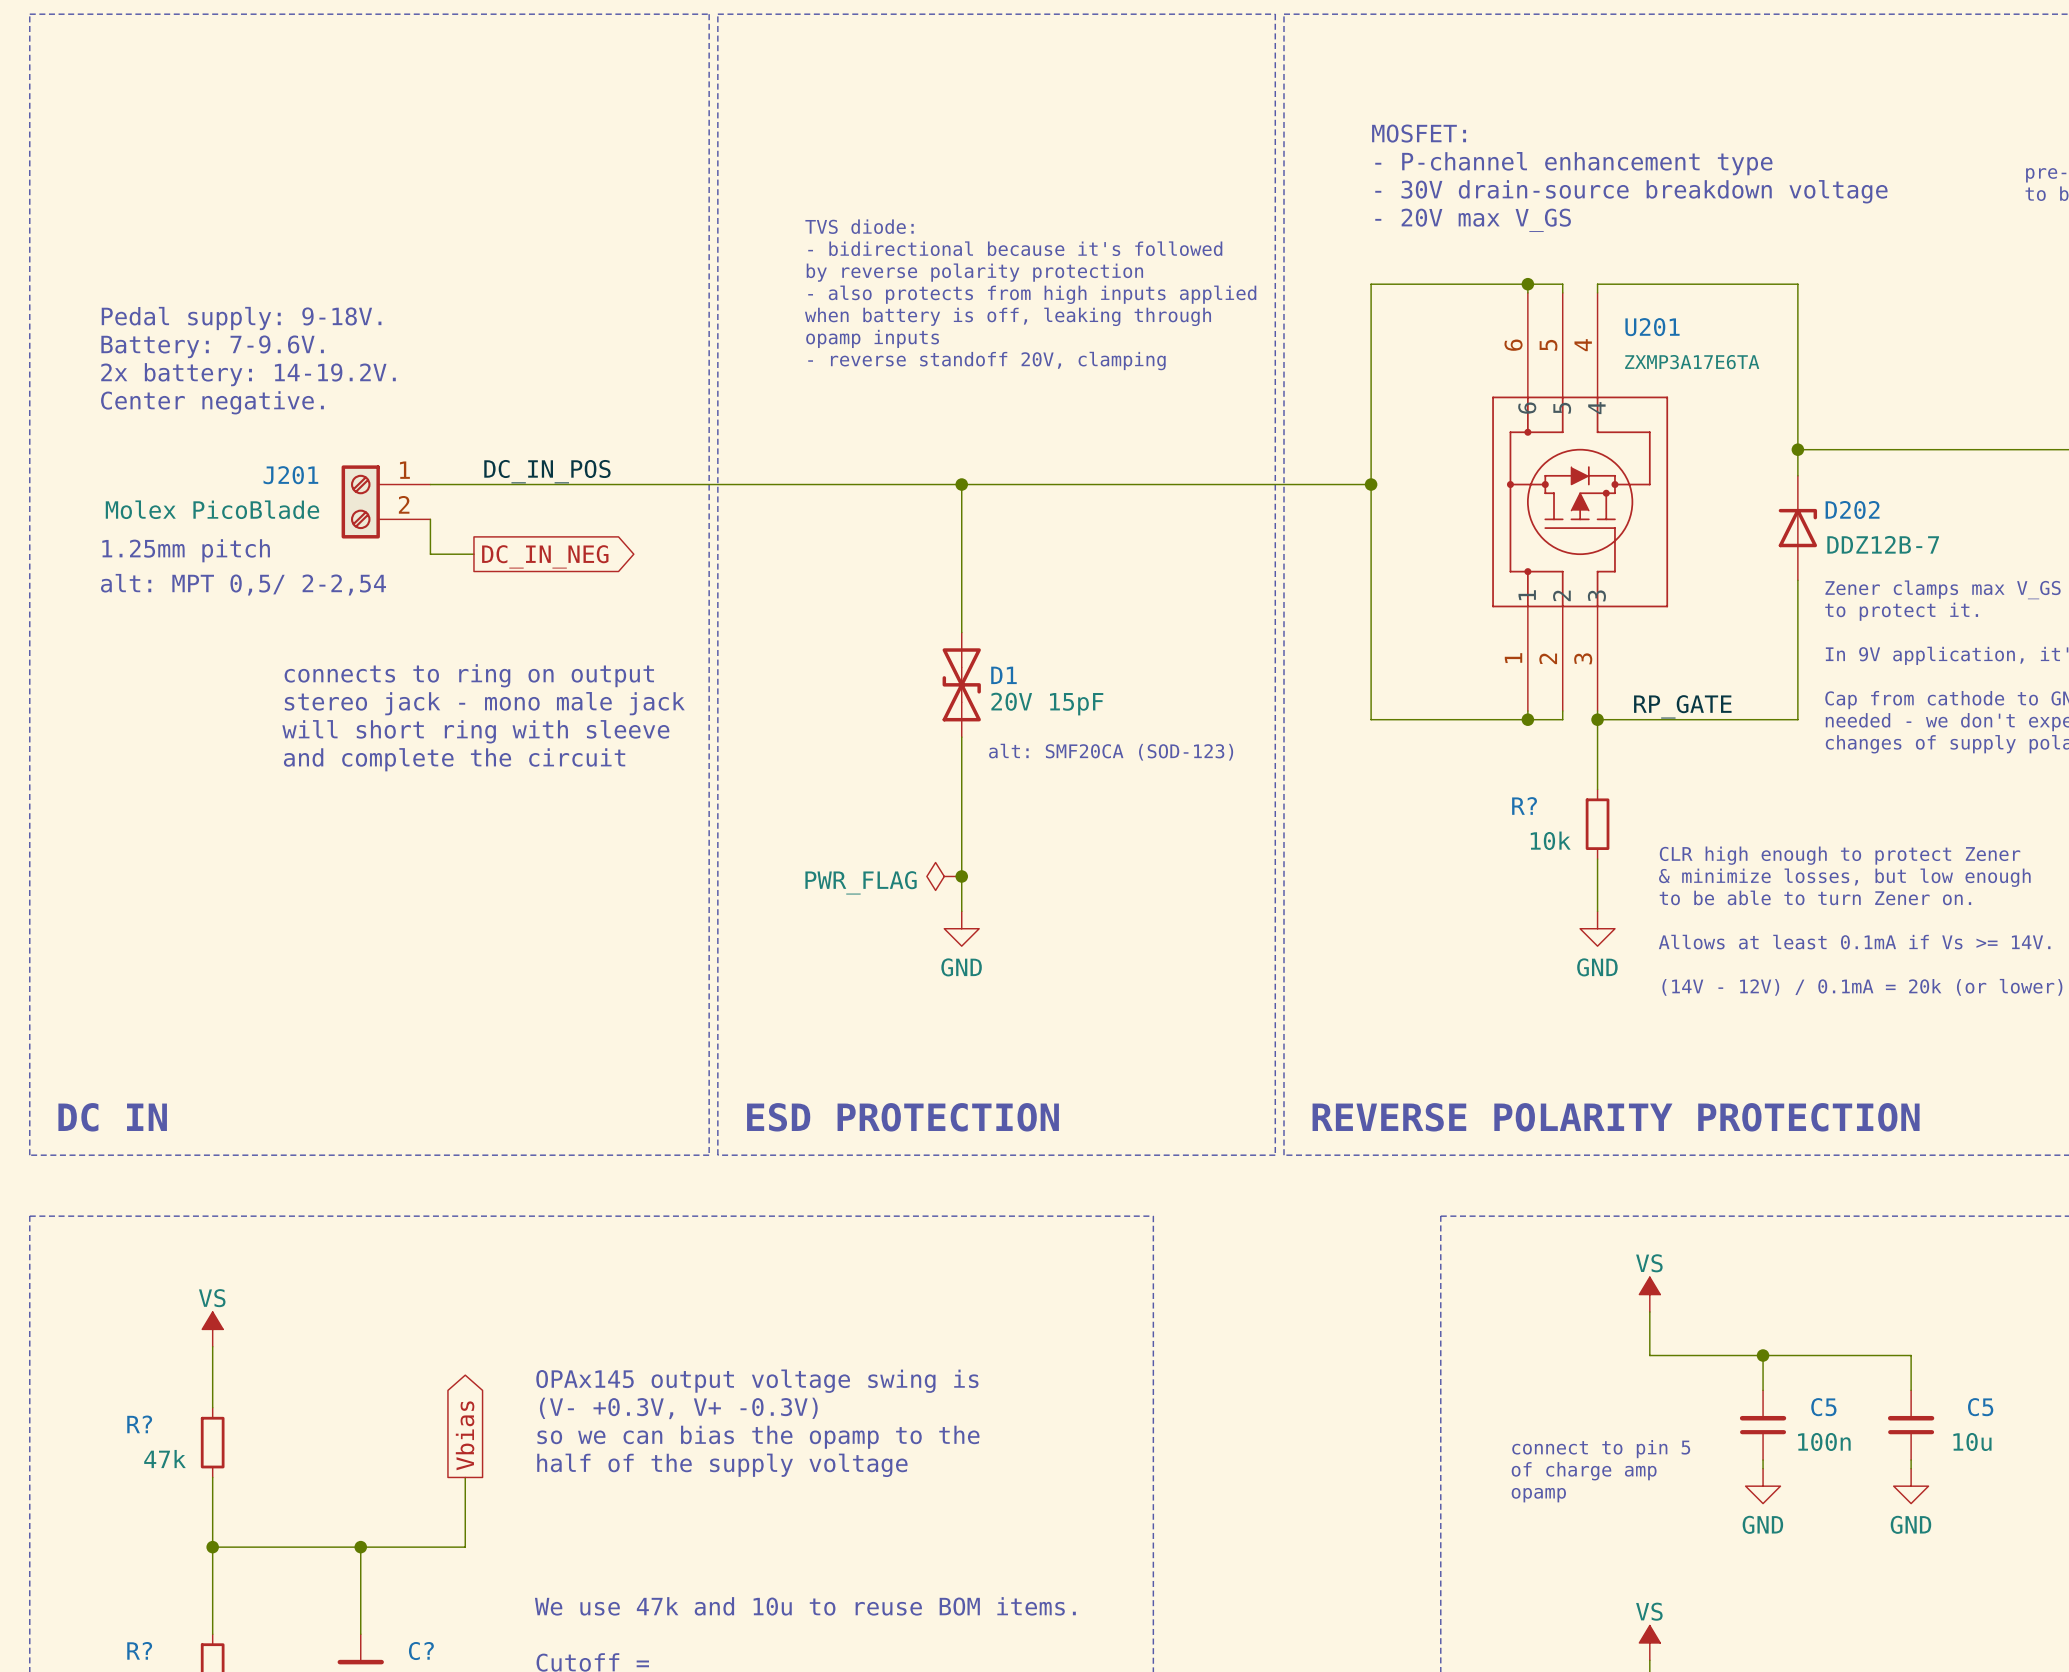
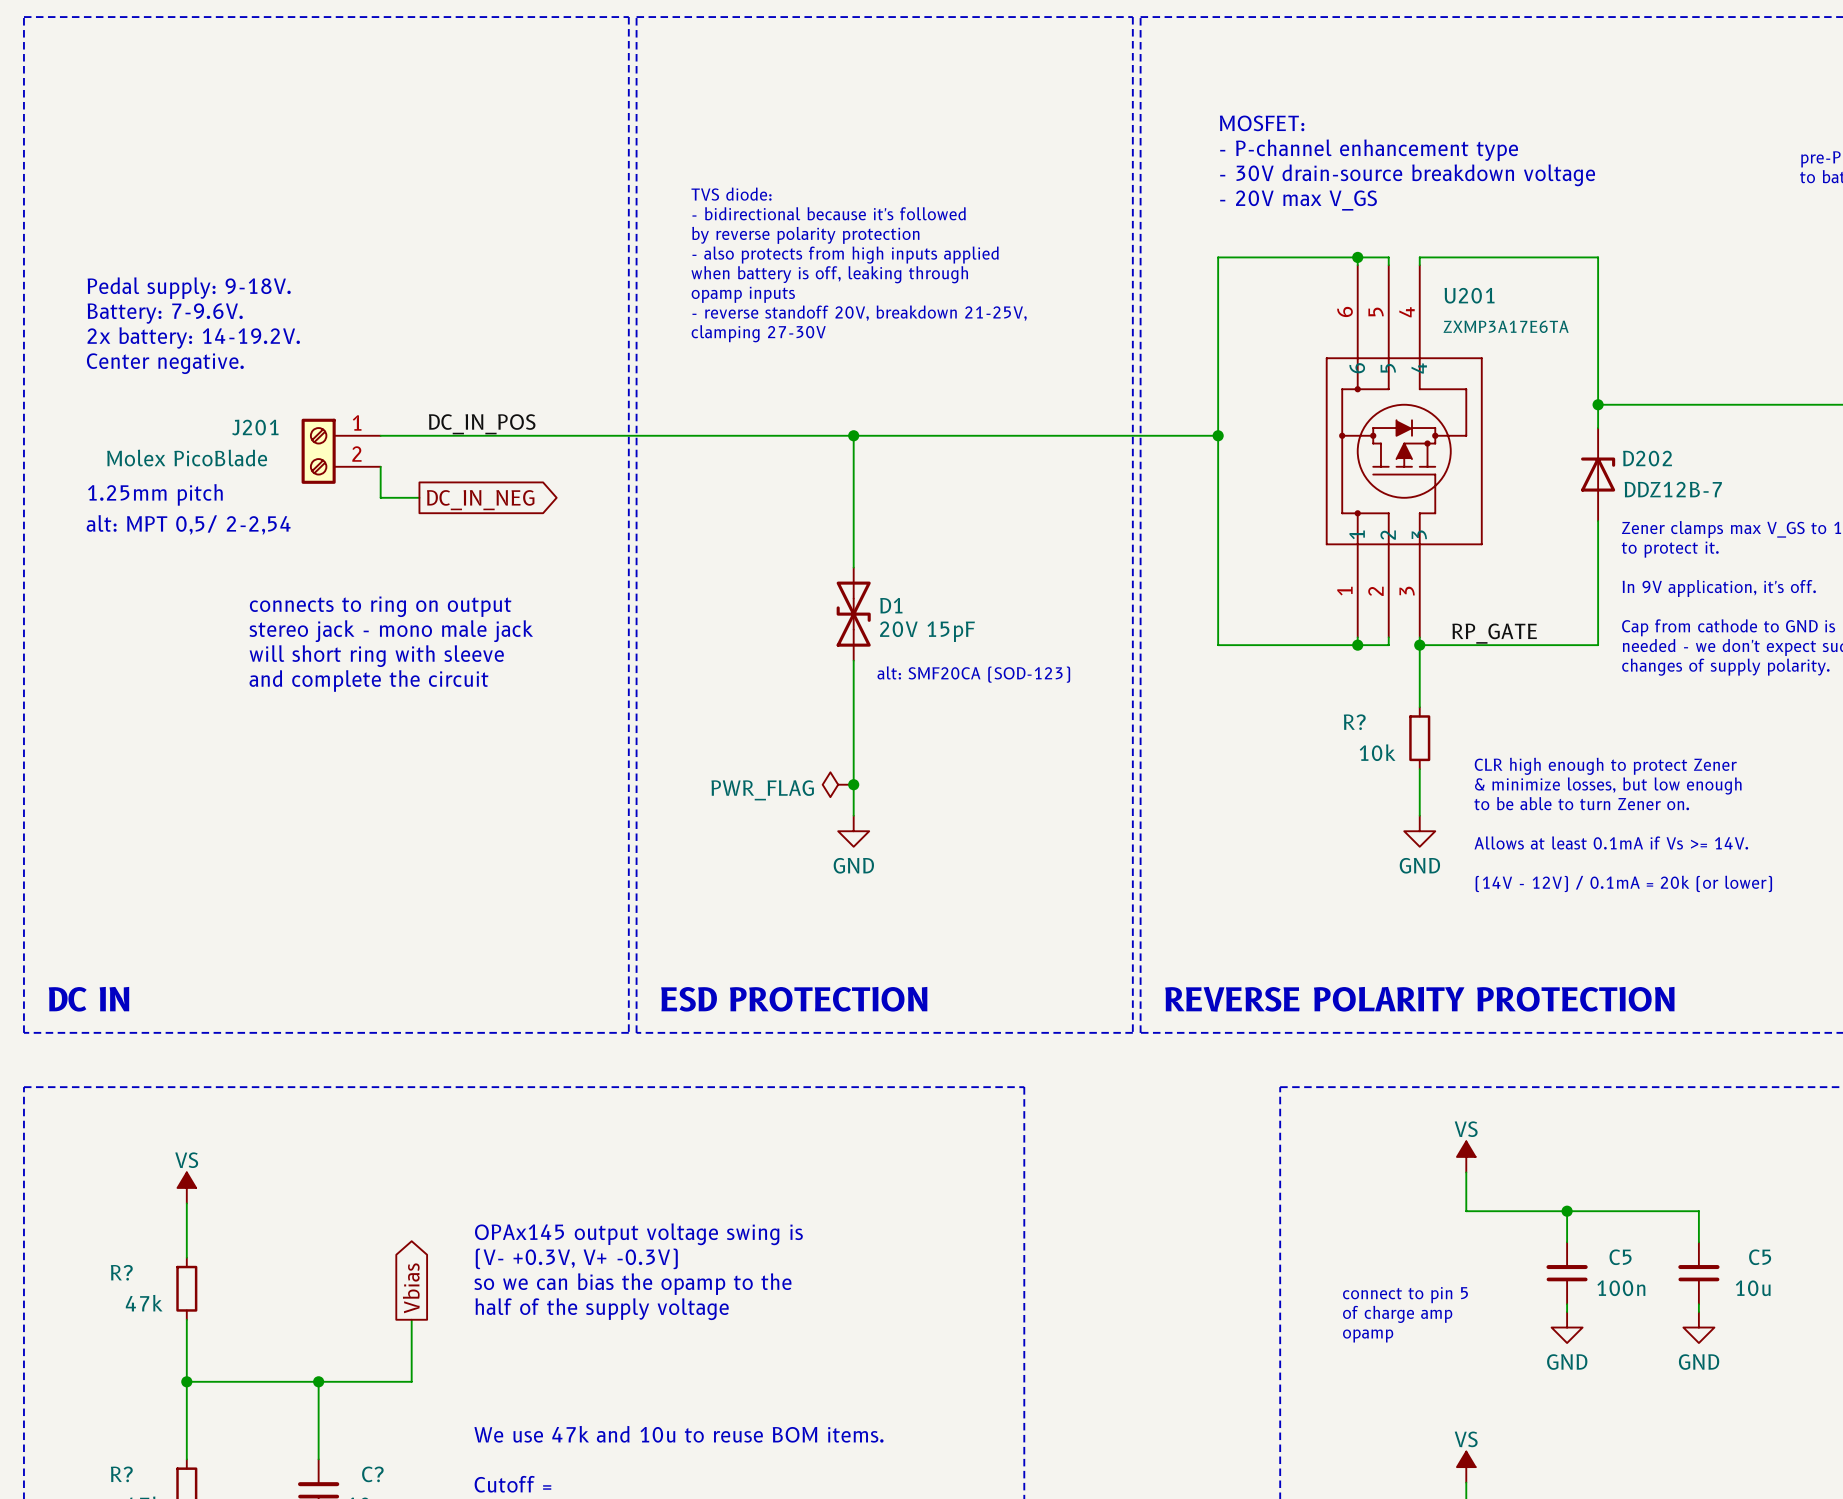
text position: TVS diode: (859, 226) -> TVS diode: (731, 194)
text position: - bidirectional because it's followed (1015, 248) -> - bidirectional because it's followed (829, 213)
text position: by reverse polarity protection (974, 272) -> by reverse polarity protection (805, 235)
text position: - also protects from high inputs applied (1032, 294) -> - also protects from high inputs applied (845, 255)
text position: when battery is off, leaking through (1008, 316) -> when battery is off, leaking through (829, 274)
text position: opamp inputs (872, 338) -> opamp inputs (743, 294)
text: - reverse standoff 20V, clamping (986, 361) -> - reverse standoff 20V, breakdown 21-25V, (859, 313)
text: none -> clamping 27-30V (758, 333)

